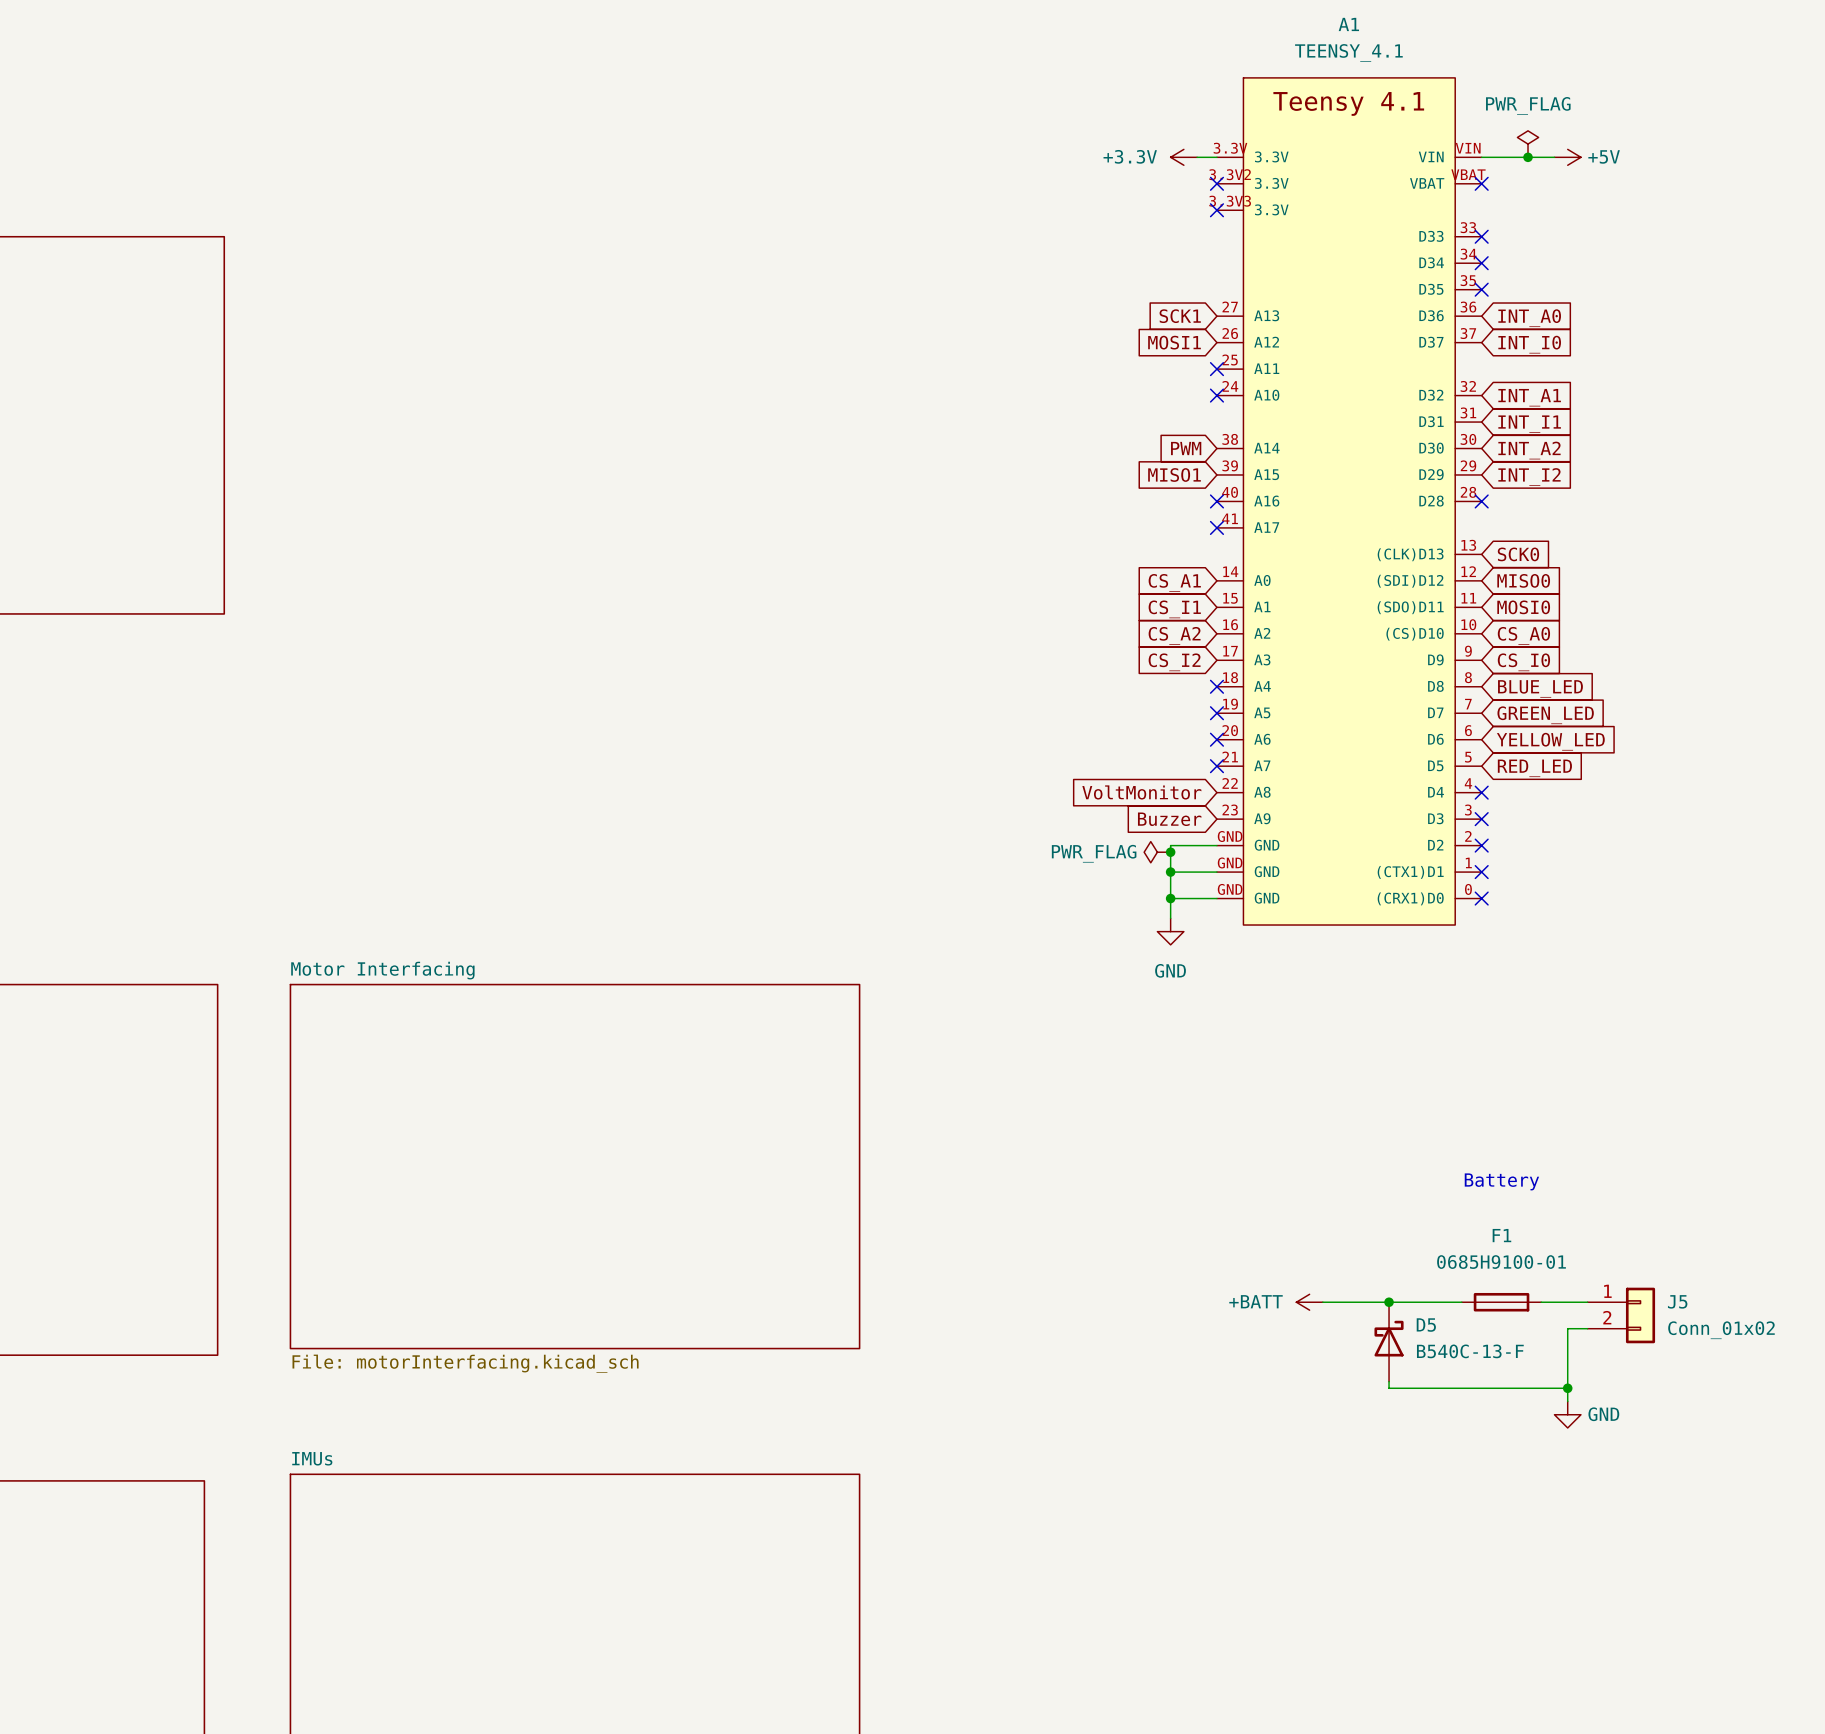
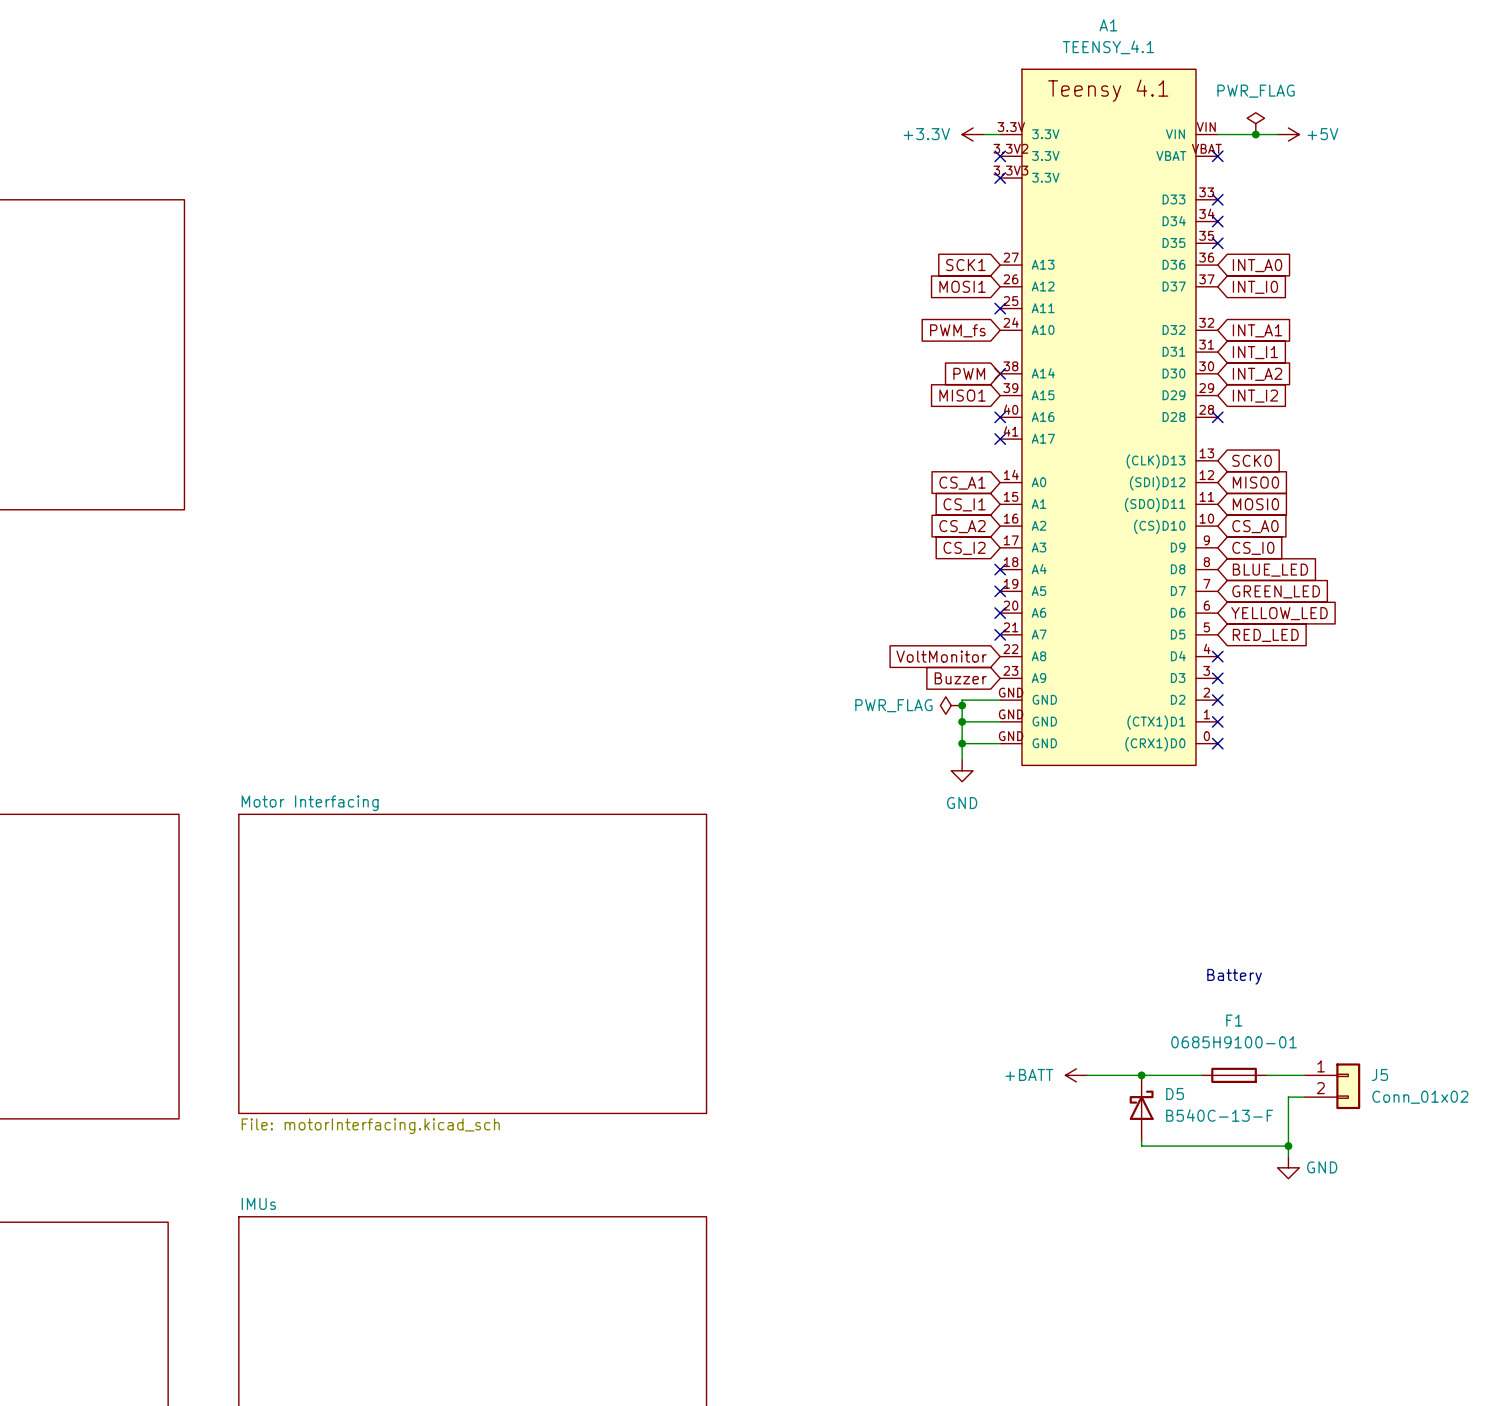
no-connect mark position: (1216, 395) -> (1000, 373)
global label: none -> PWM_fs (957, 330)

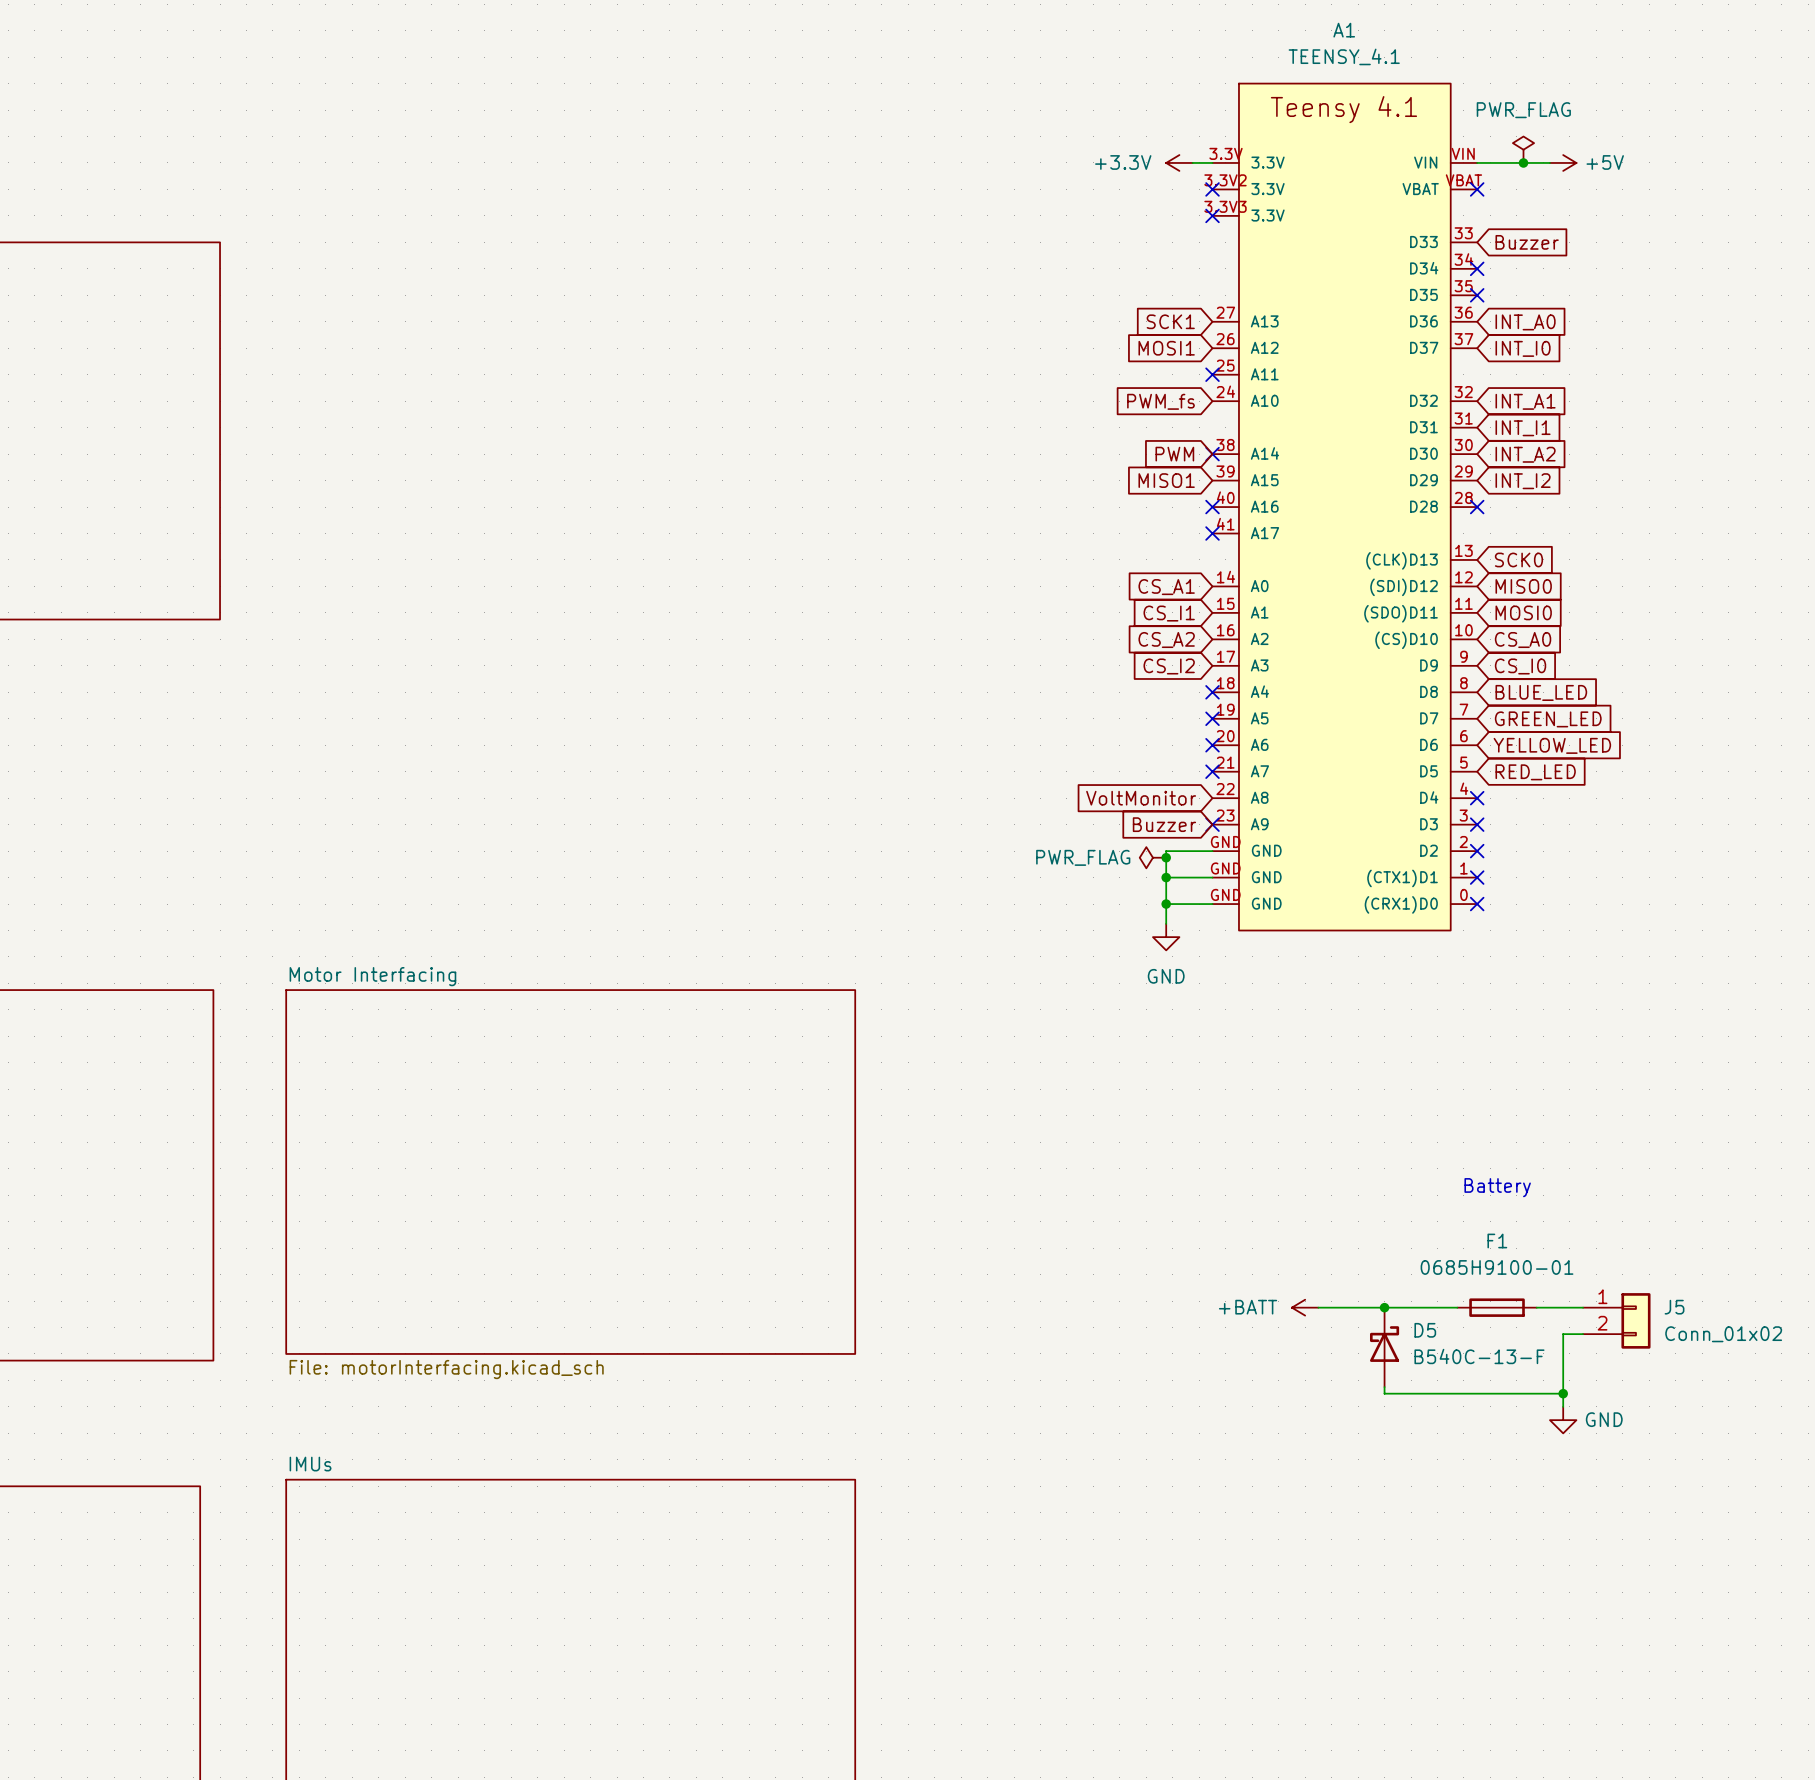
no-connect mark: (1217, 199) -> none
global label: none -> Buzzer (1527, 242)
no-connect mark: none -> (1212, 824)

